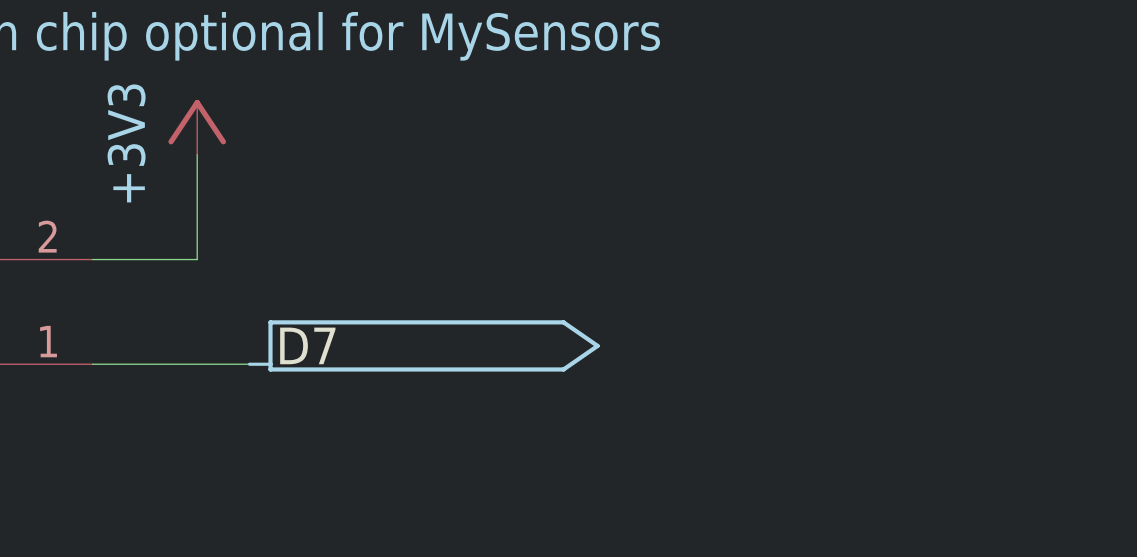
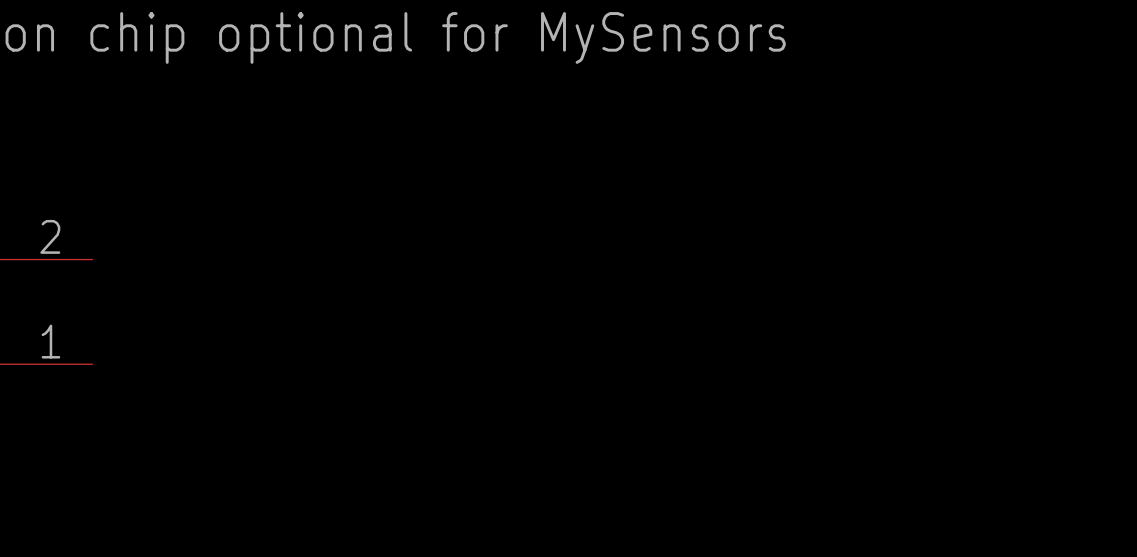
power symbol: +3V3 (197, 127) -> none
wire: (197, 154) (197, 259) (92, 259) -> none
label: D7 (307, 345) -> none
part: (423, 345) -> none
wire: (92, 364) (249, 364) -> none

